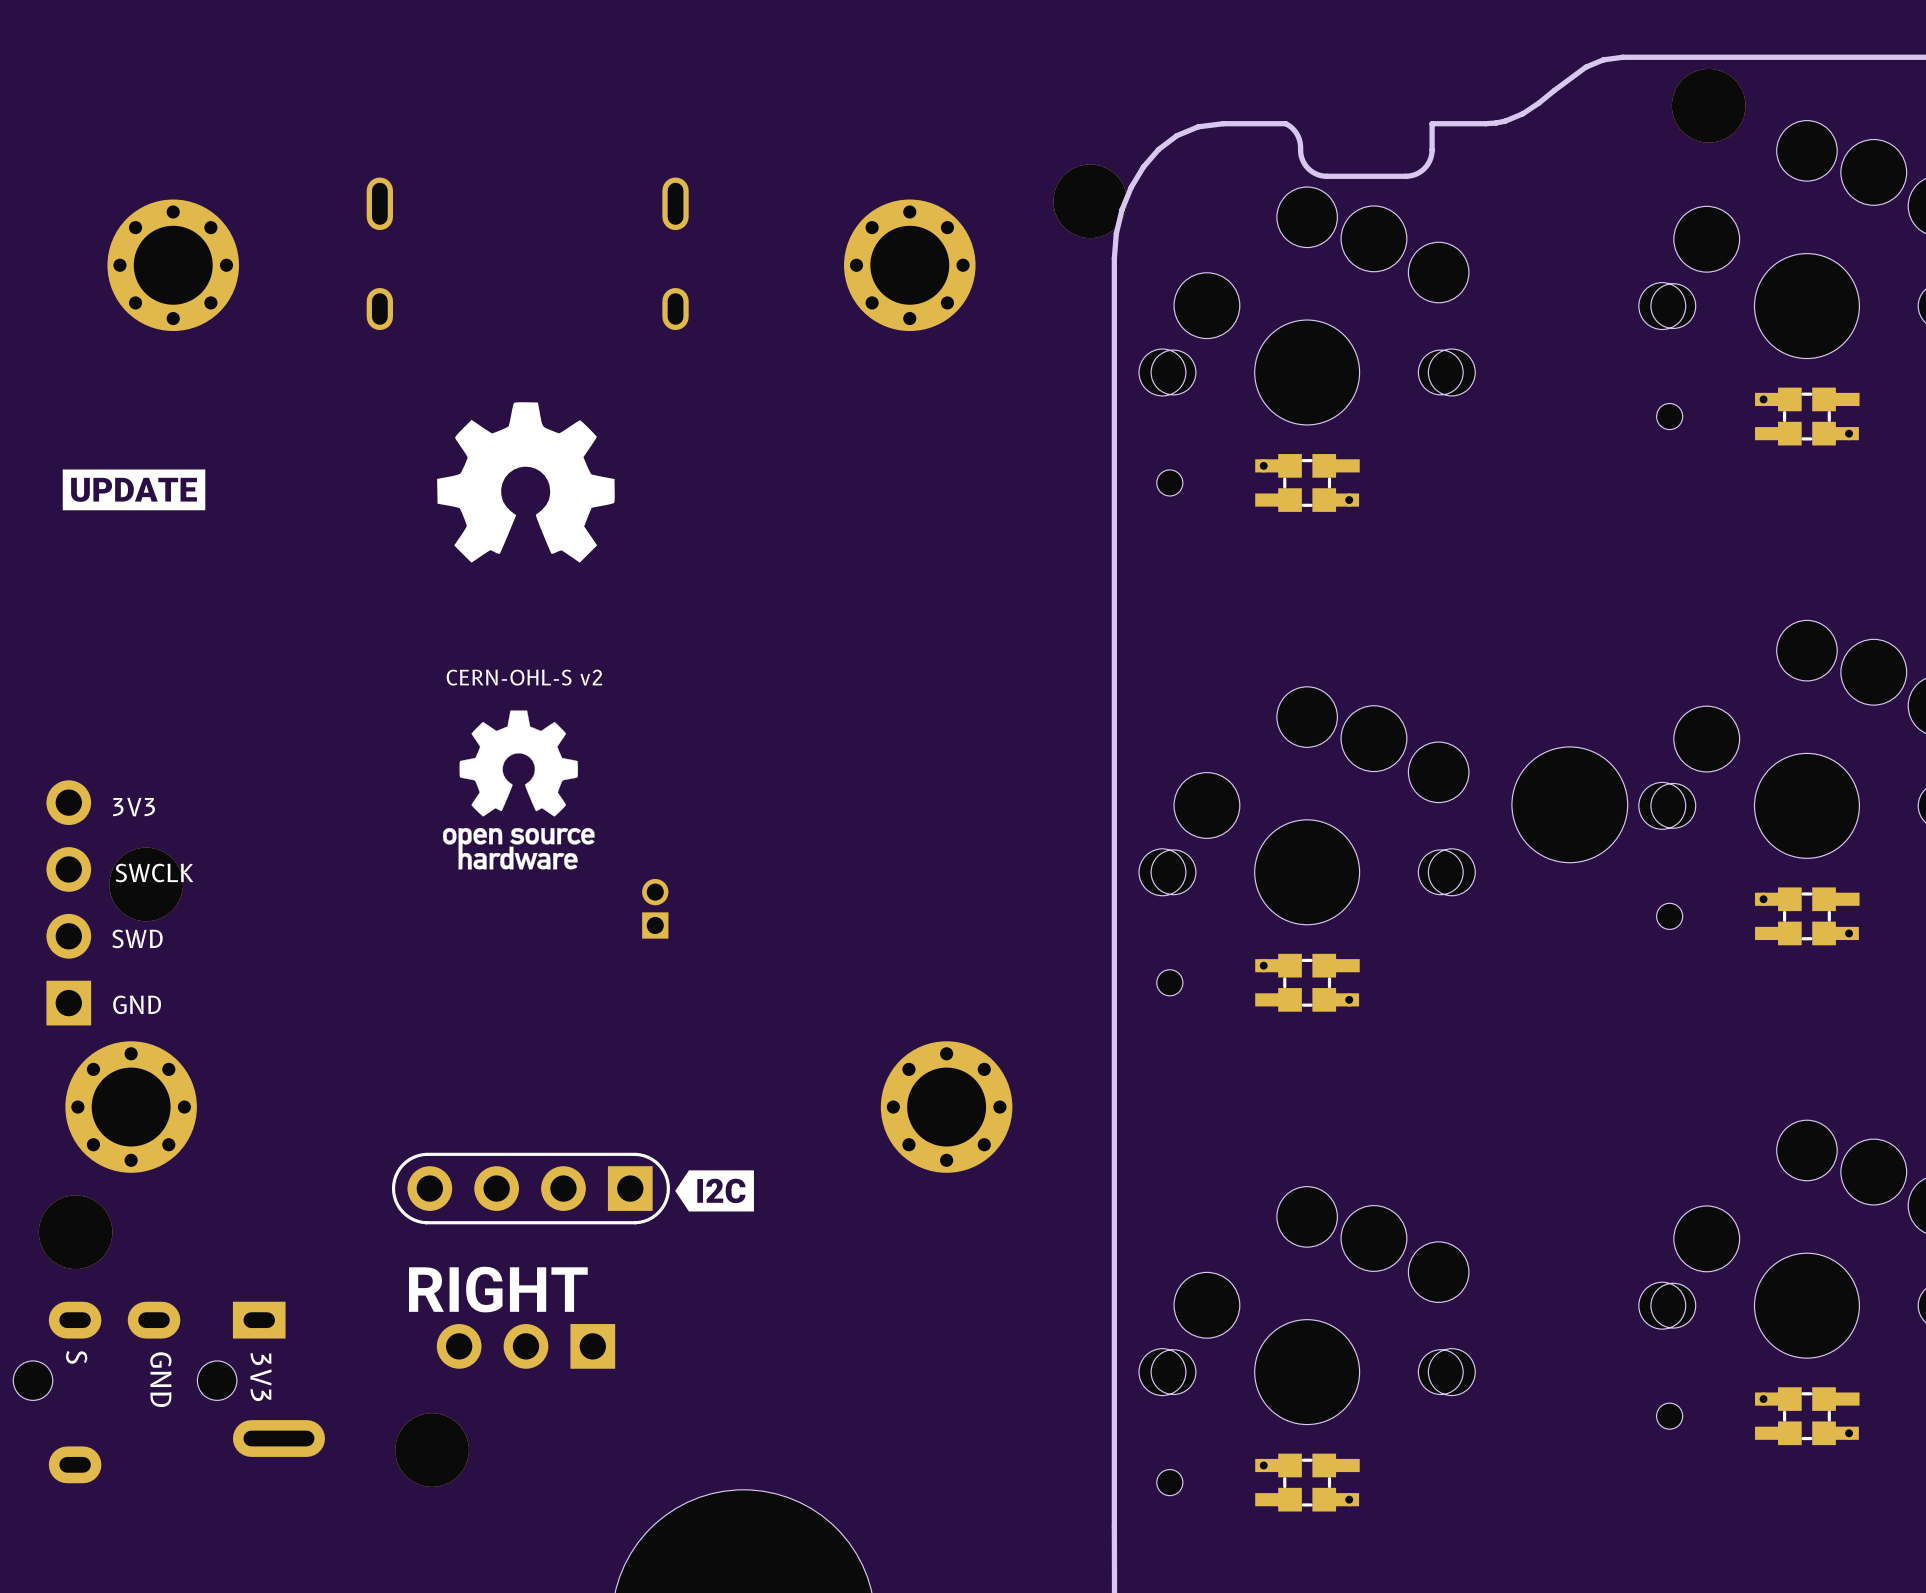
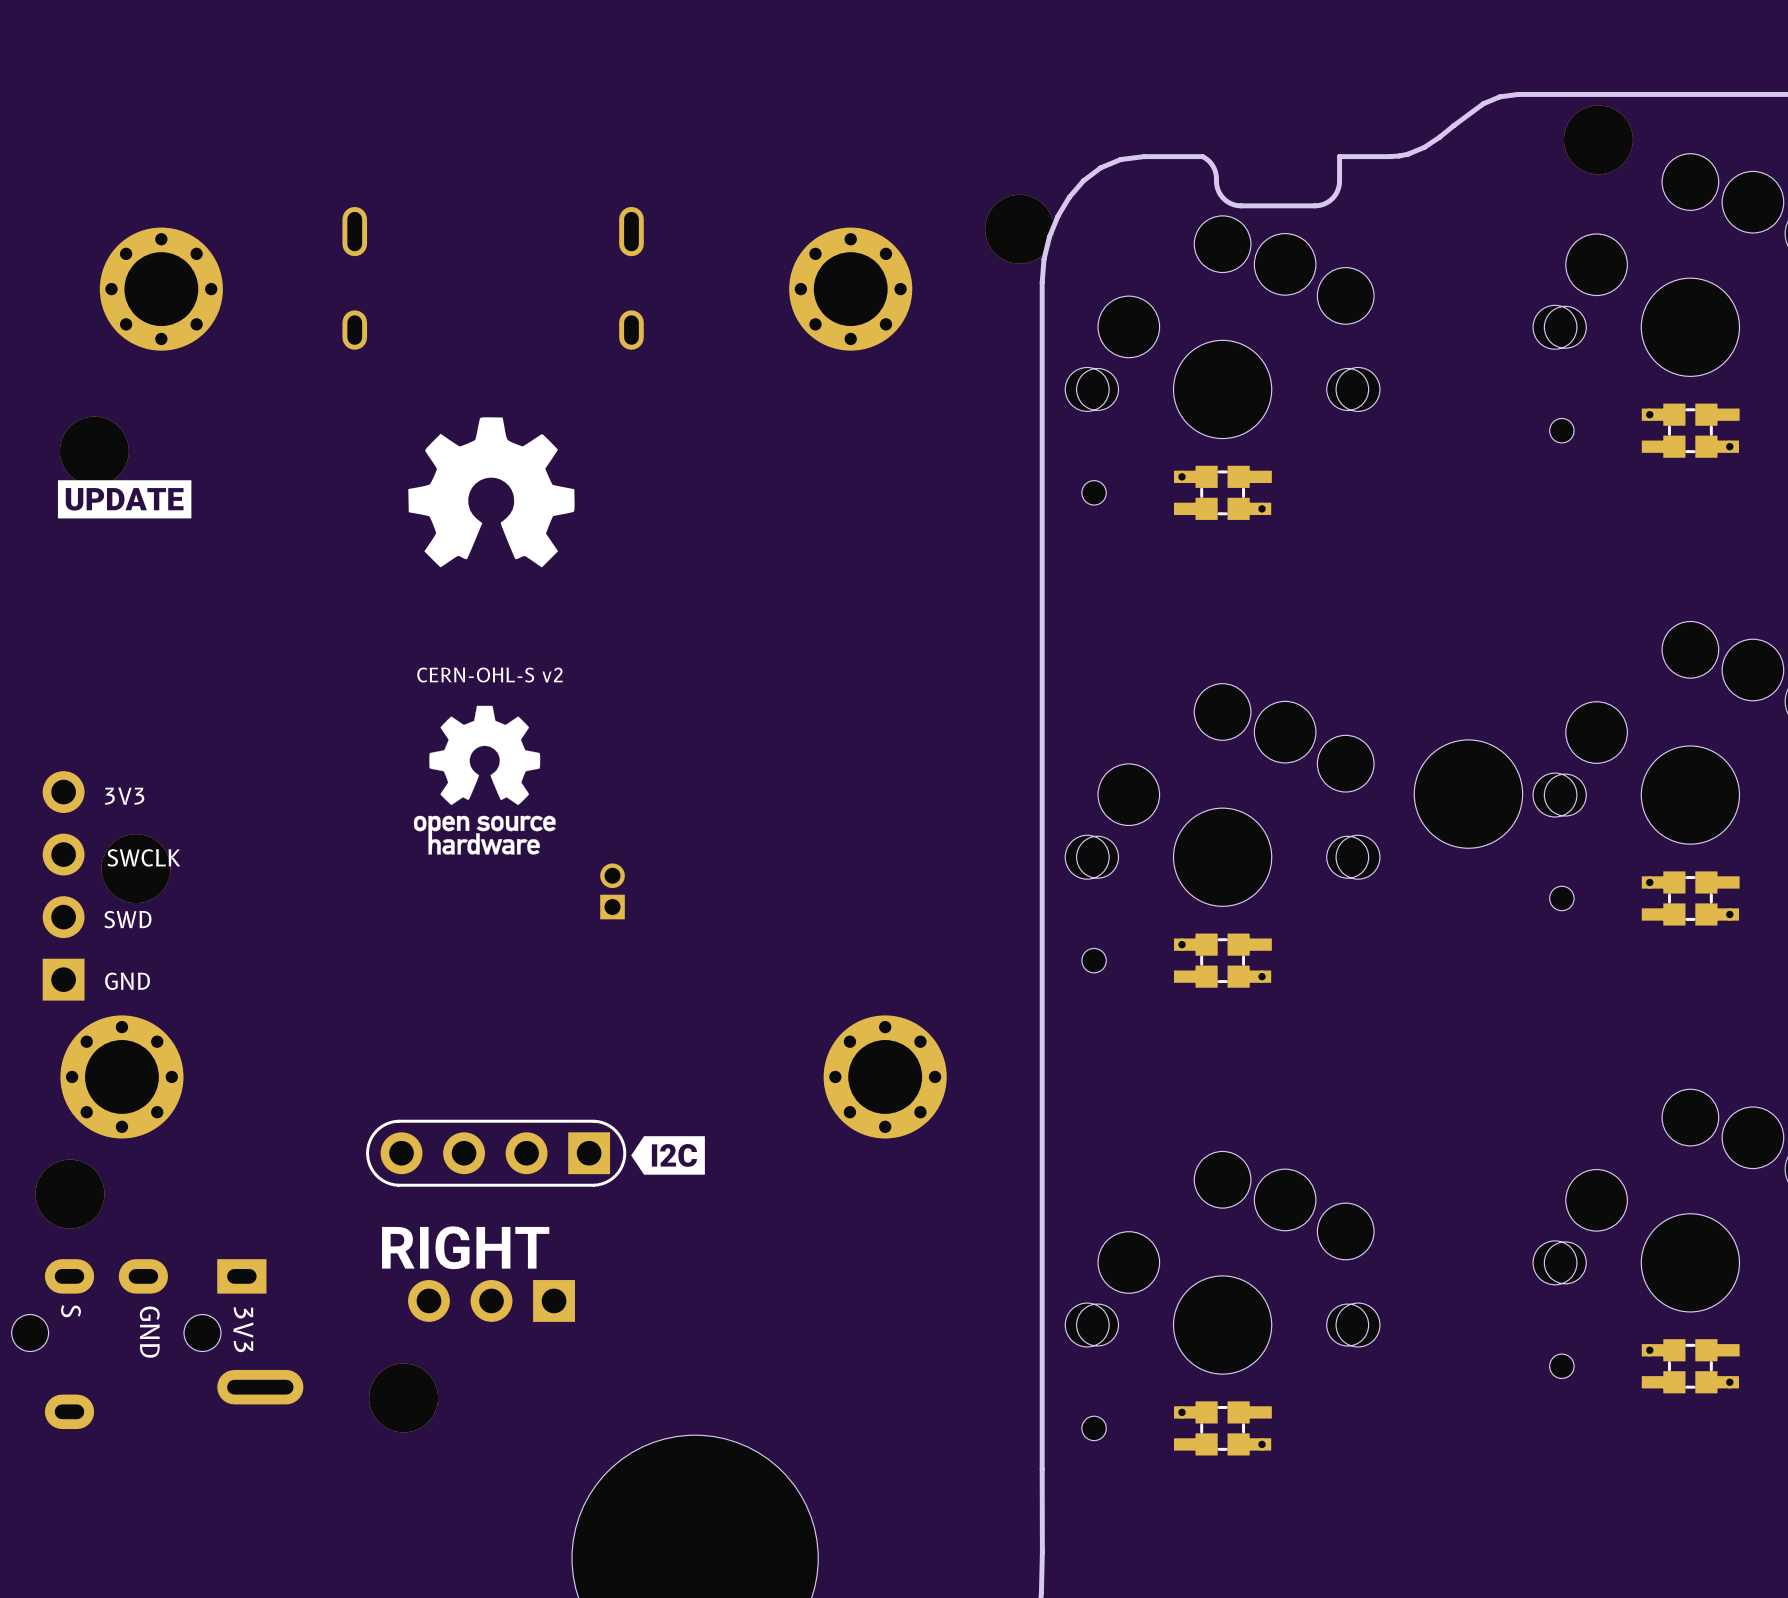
part: none -> (94, 451)

